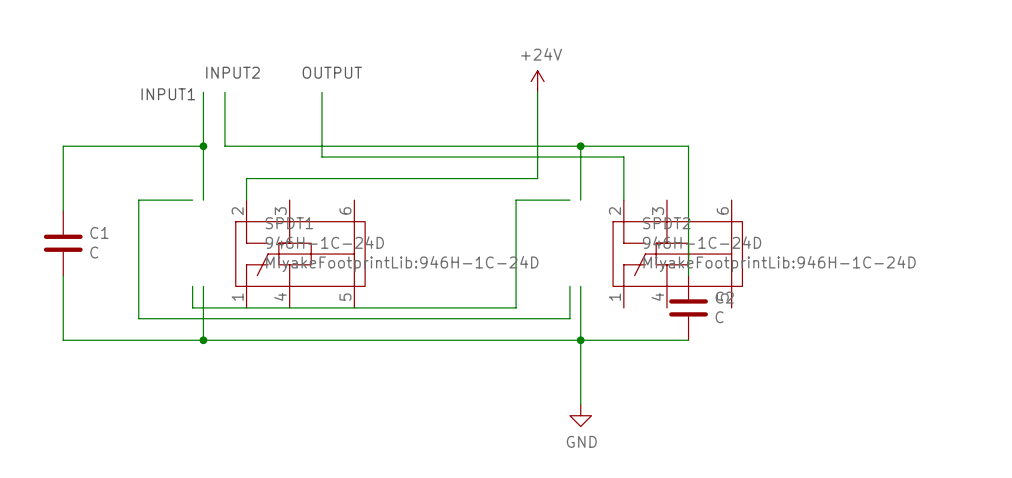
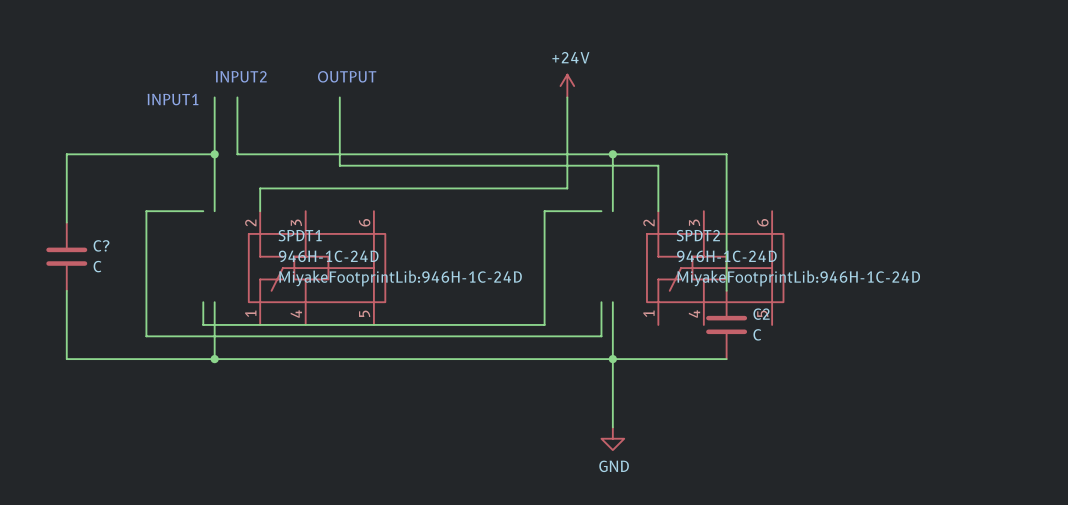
C1 name: C1 (99, 232) -> C? (101, 245)

